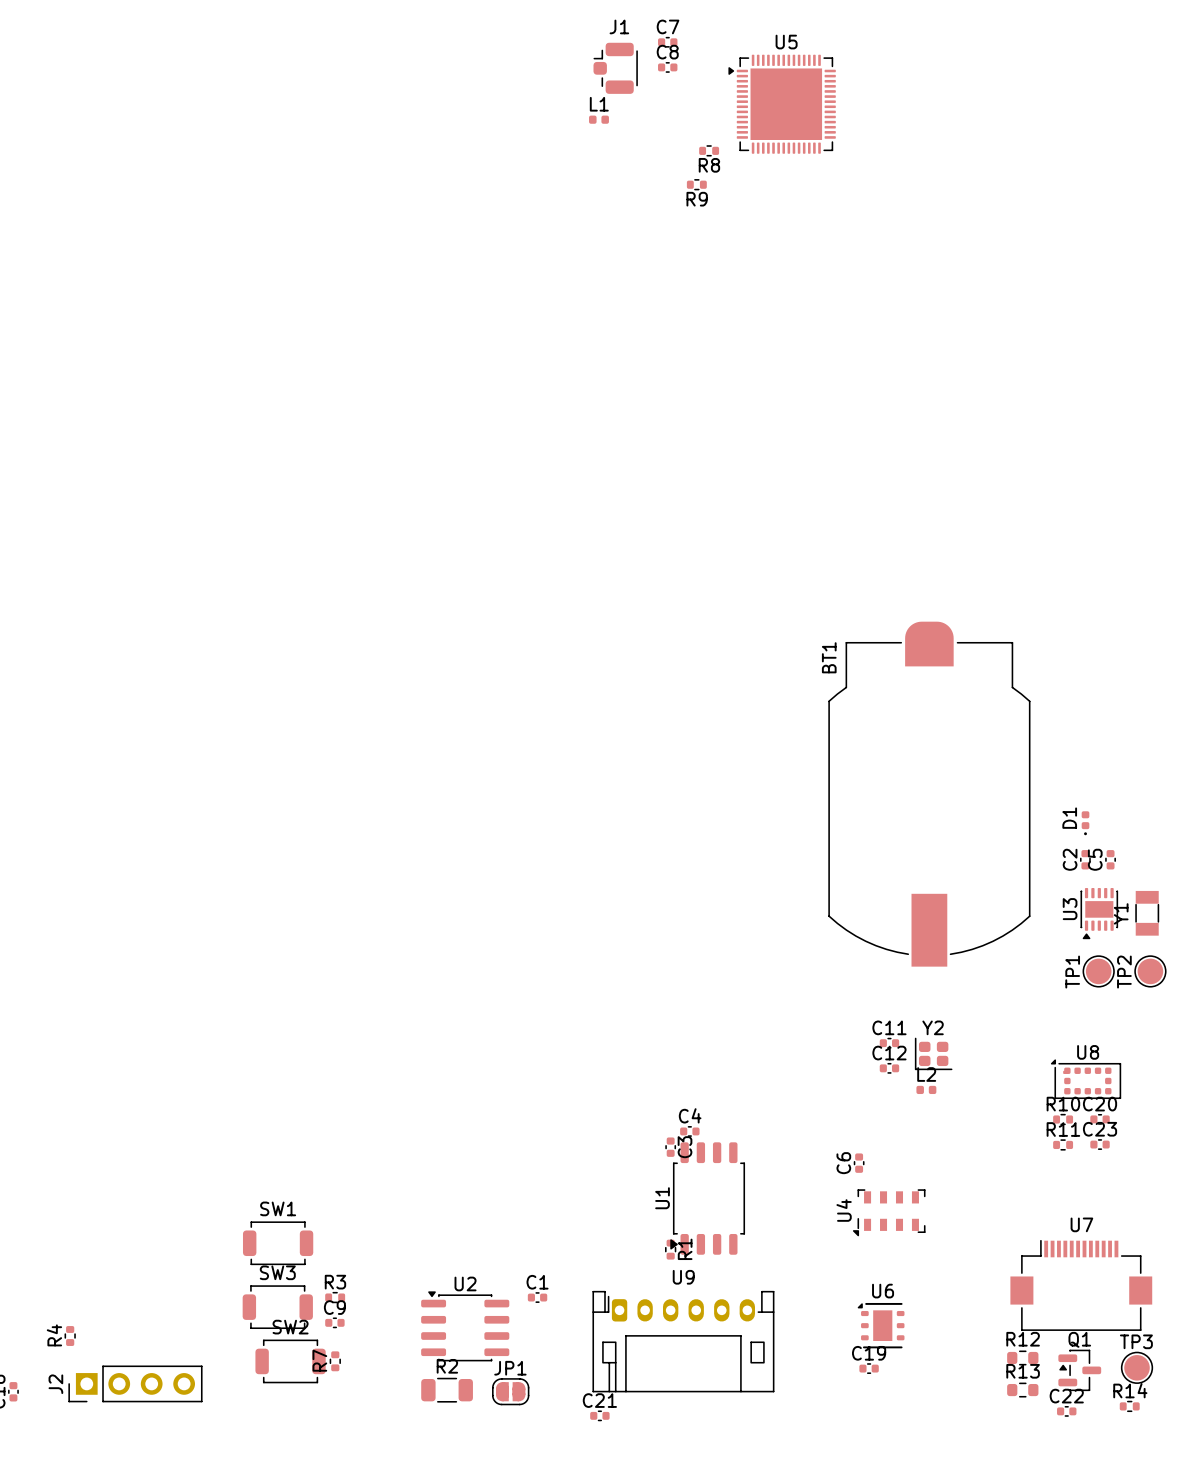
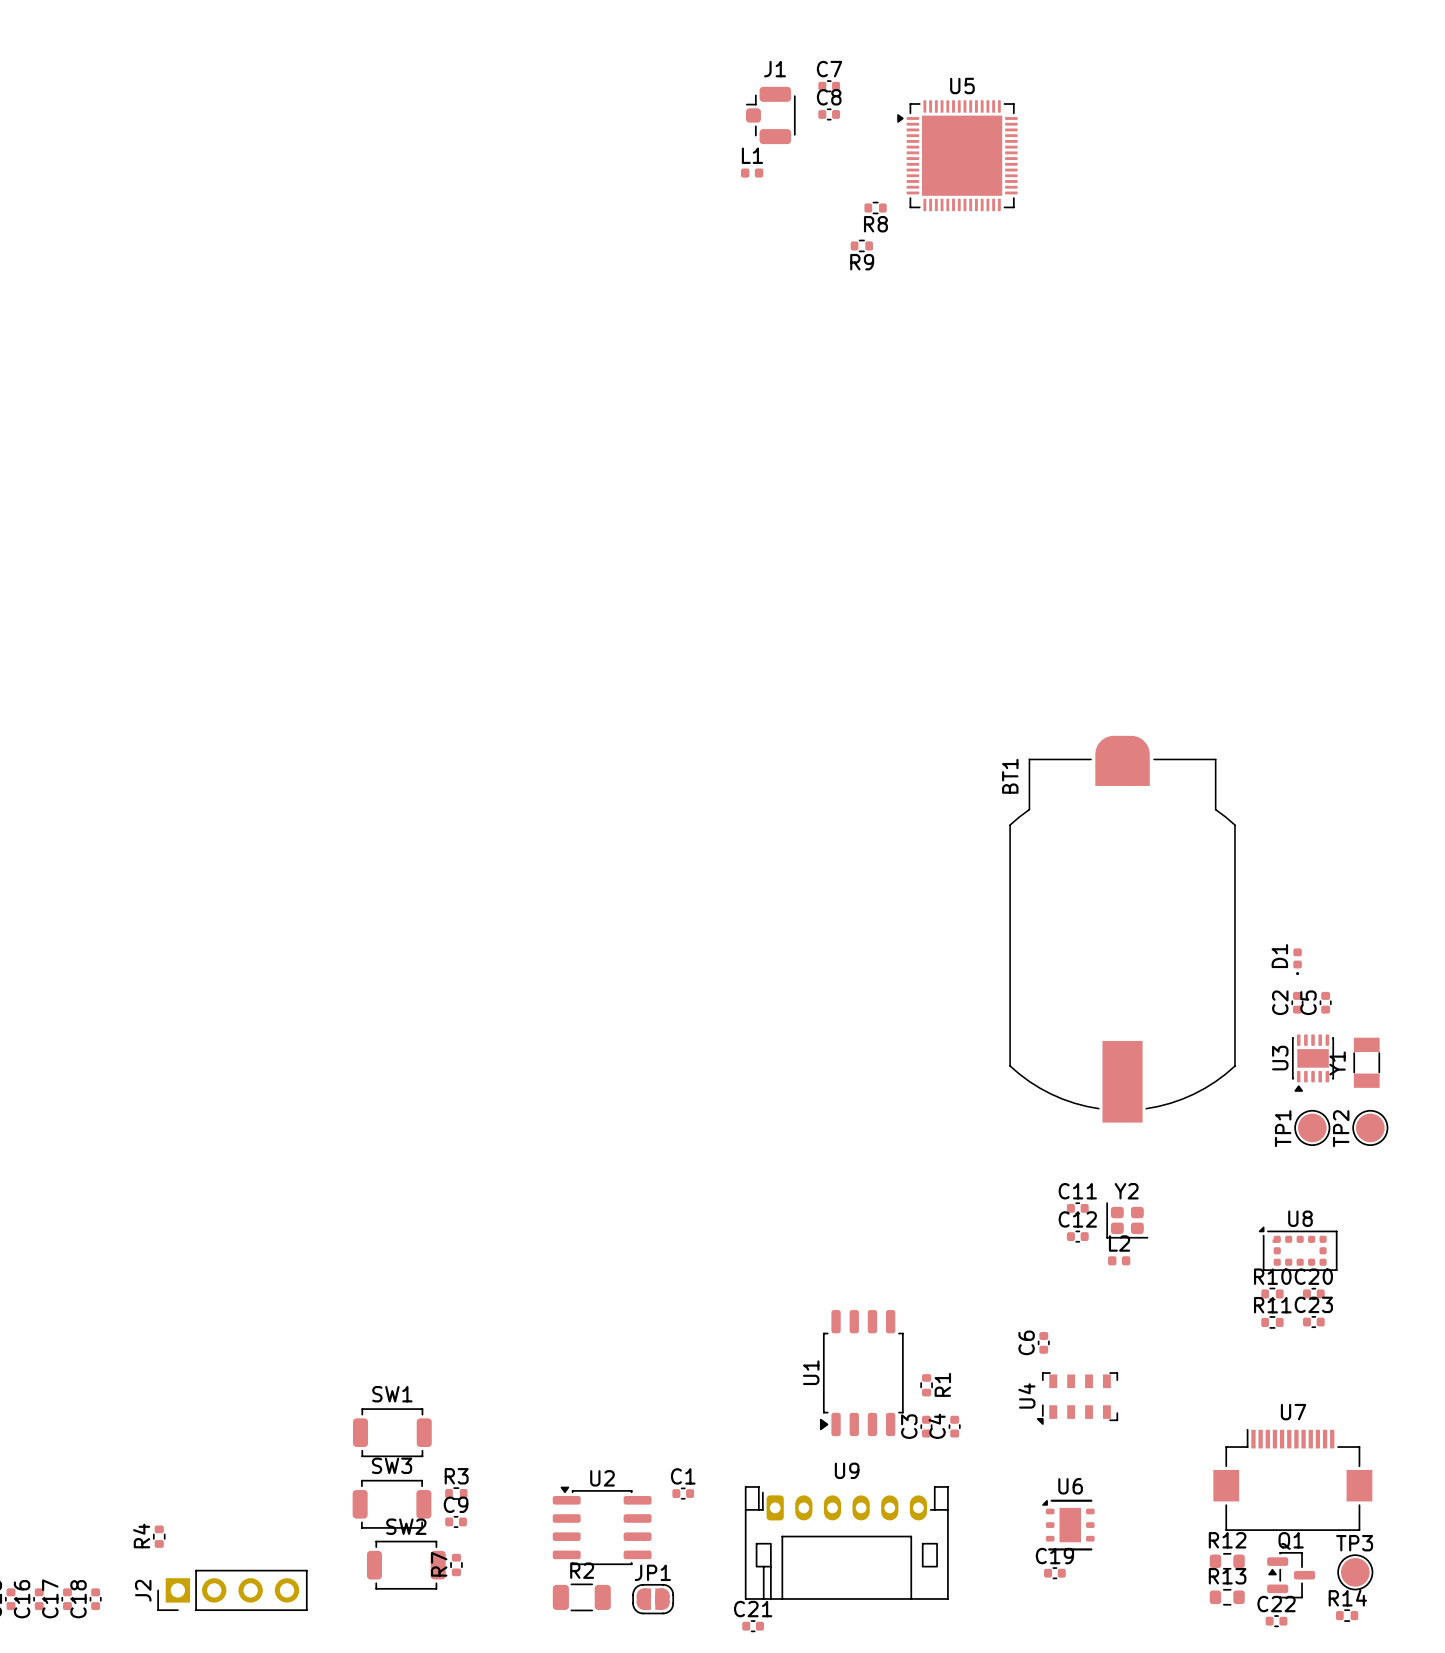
C4 rotation: 0° (689, 1131) -> 90° clockwise (954, 1426)
C4 position: (689, 1131) -> (954, 1426)
C3 position: (670, 1147) -> (926, 1426)
C3 name position: C3 (685, 1147) -> C3 (909, 1426)
U1 position: (707, 1198) -> (861, 1373)
R1 position: (670, 1249) -> (926, 1385)

